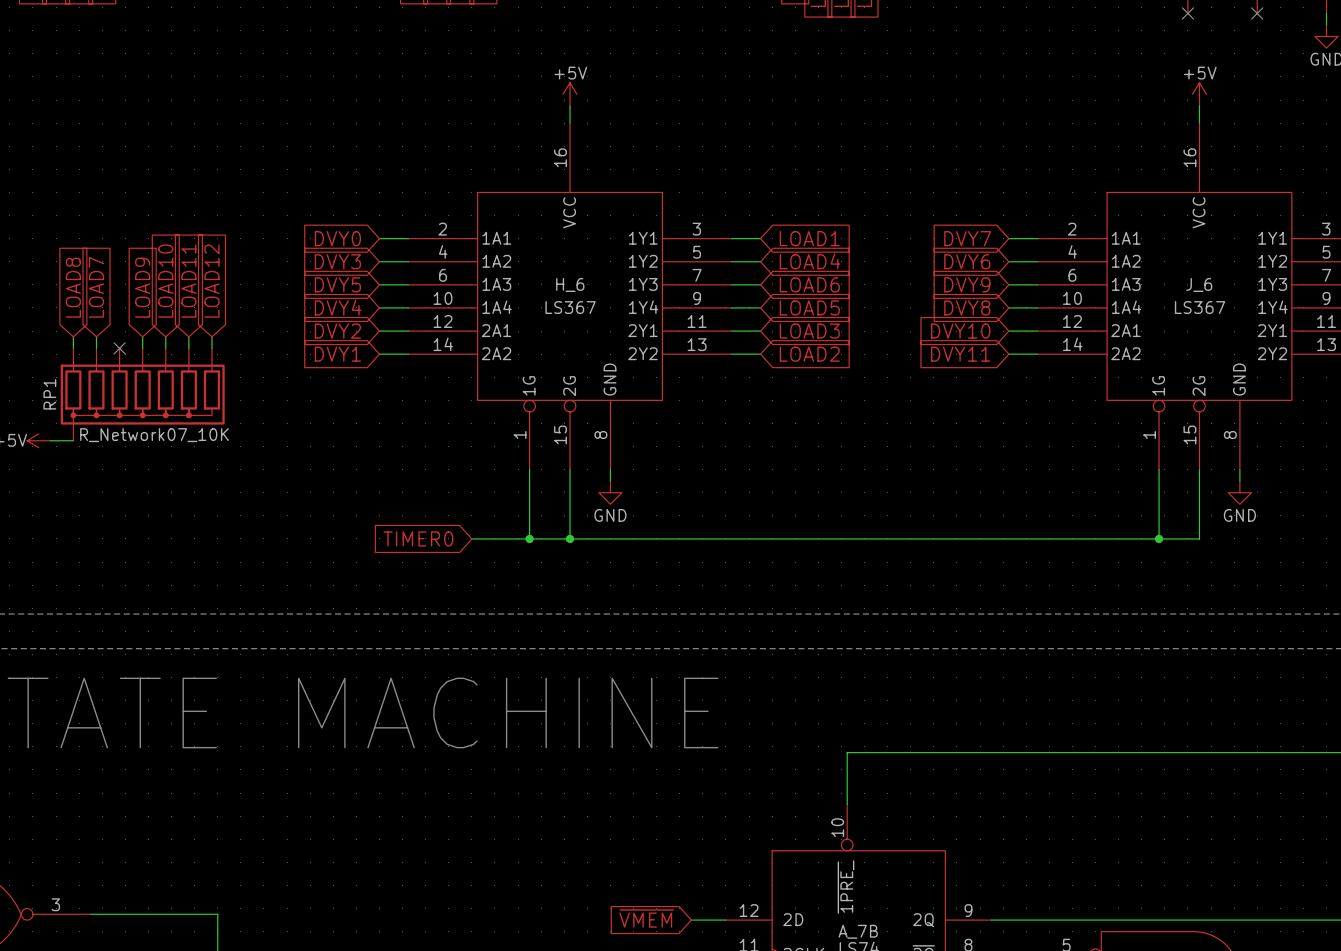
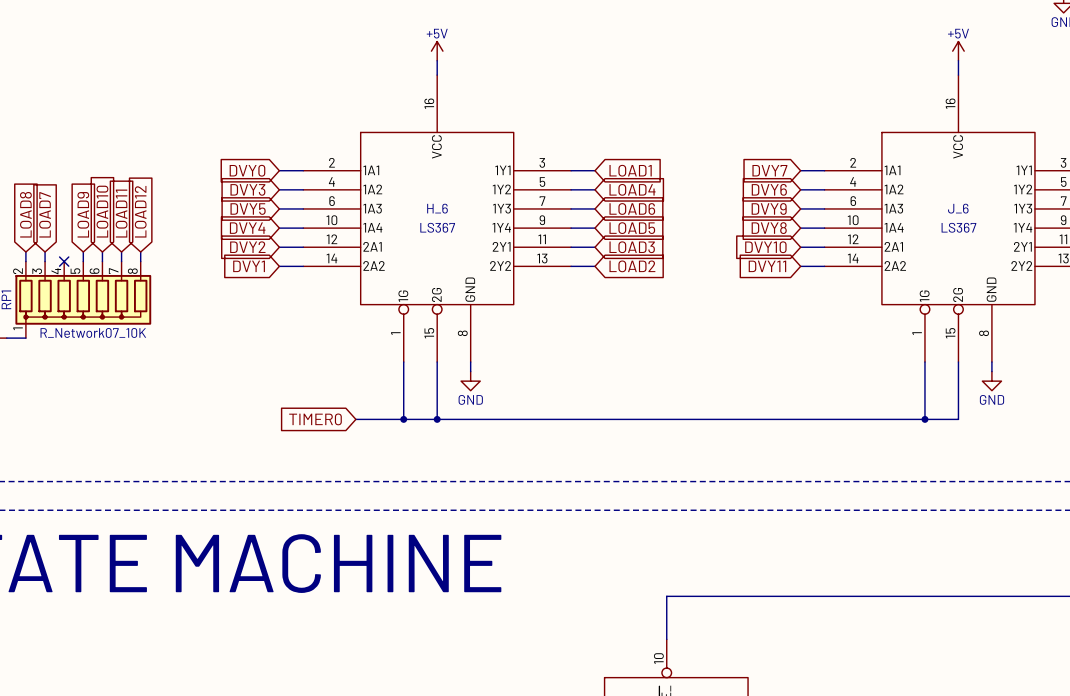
RP1 pin number: none -> 4 (56, 271)
RP1 pin number: none -> 5 (75, 271)
RP1 pin number: none -> 6 (94, 271)
RP1 pin number: none -> 7 (113, 271)
RP1 pin number: none -> 8 (132, 271)
RP1 pin number: none -> 2 (17, 271)
RP1 pin number: none -> 3 (37, 271)
RP1 pin number: none -> 1 (18, 328)

